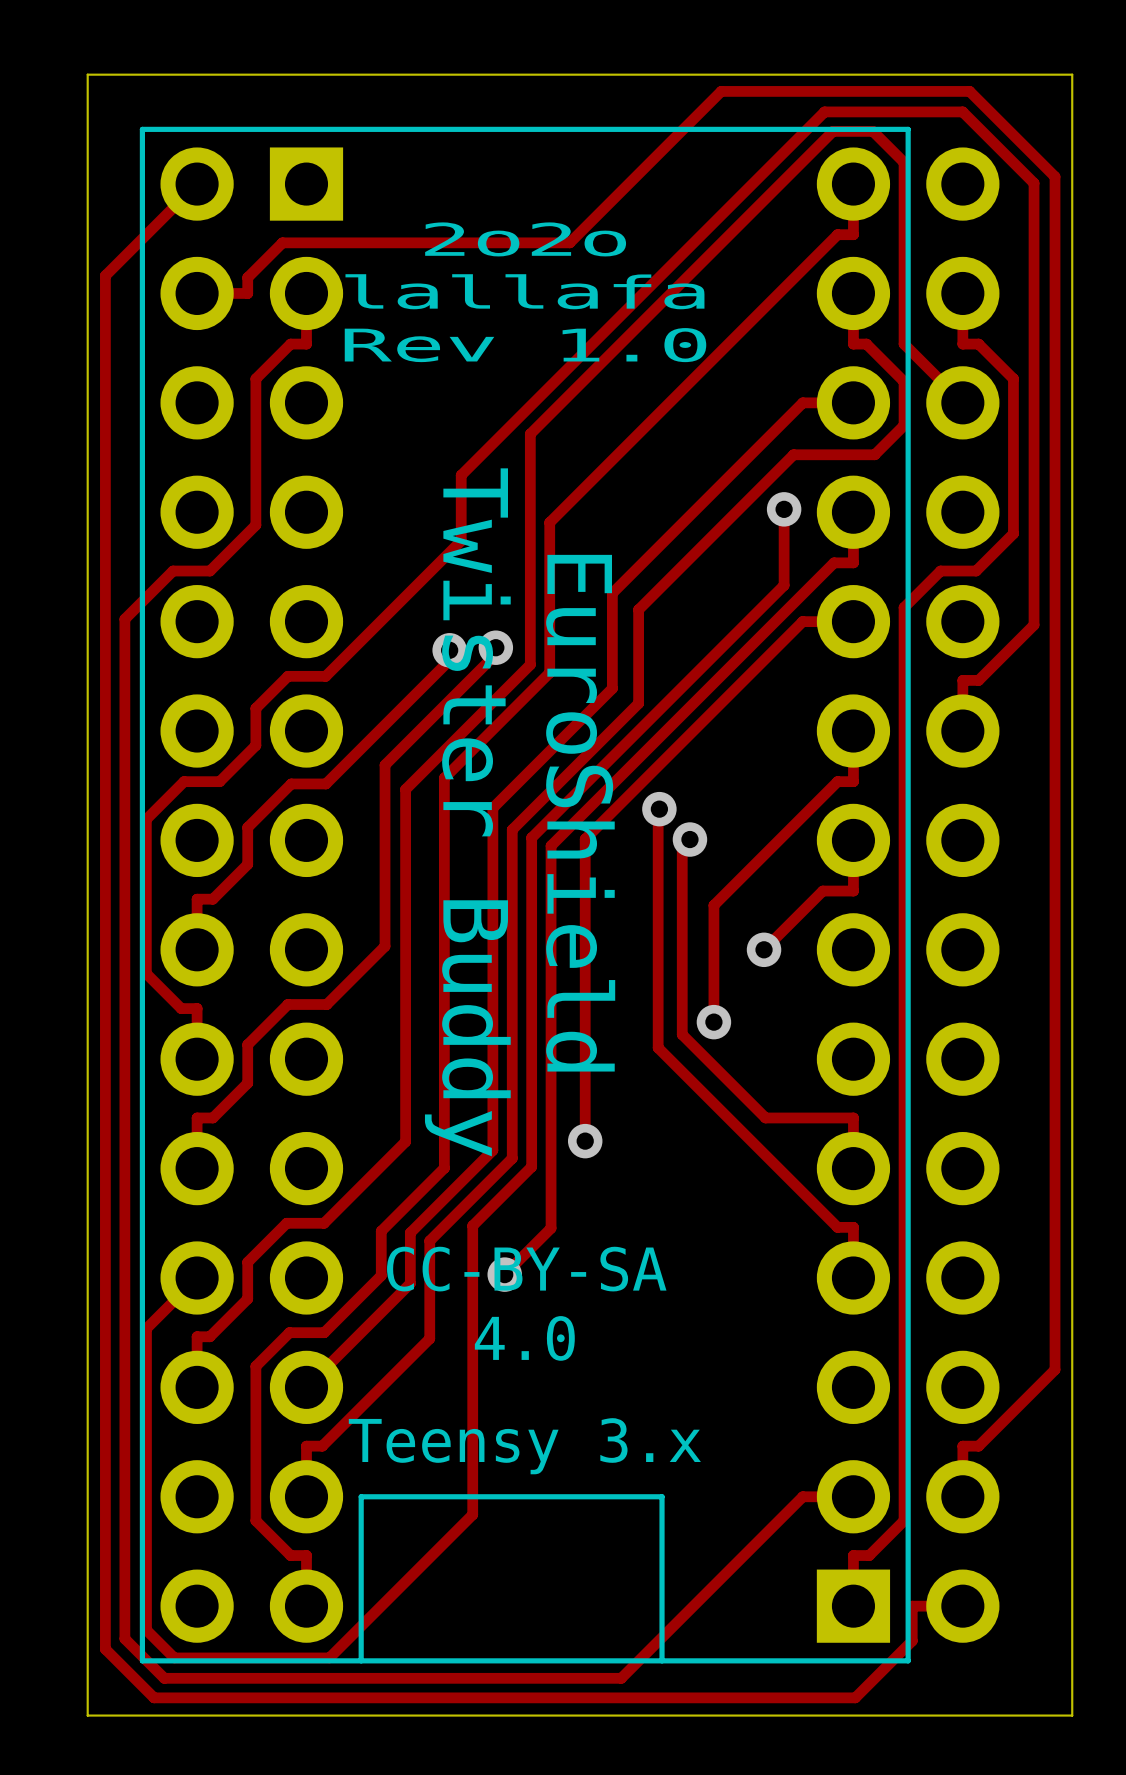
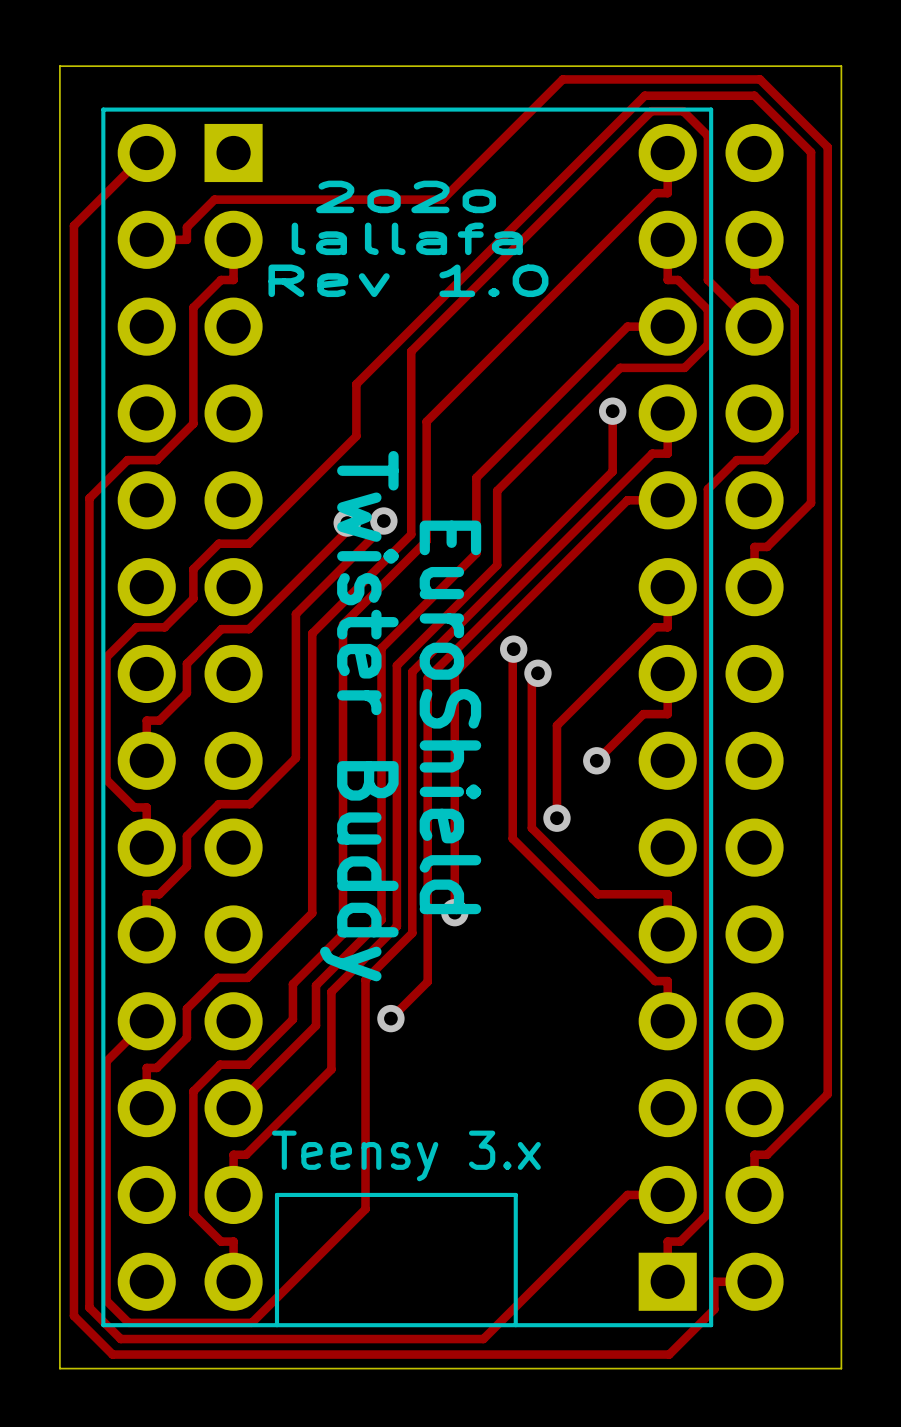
text position: Twister Buddy (467, 812) -> Twister Buddy (359, 716)
text position: EuroShield (580, 813) -> EuroShield (450, 717)
text: CC-BY-SA (526, 1269) -> none
text: 4.0 (524, 1338) -> none

